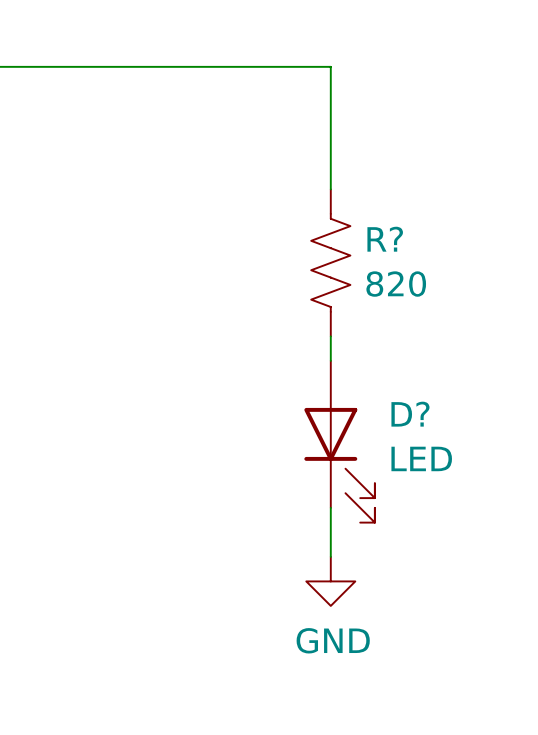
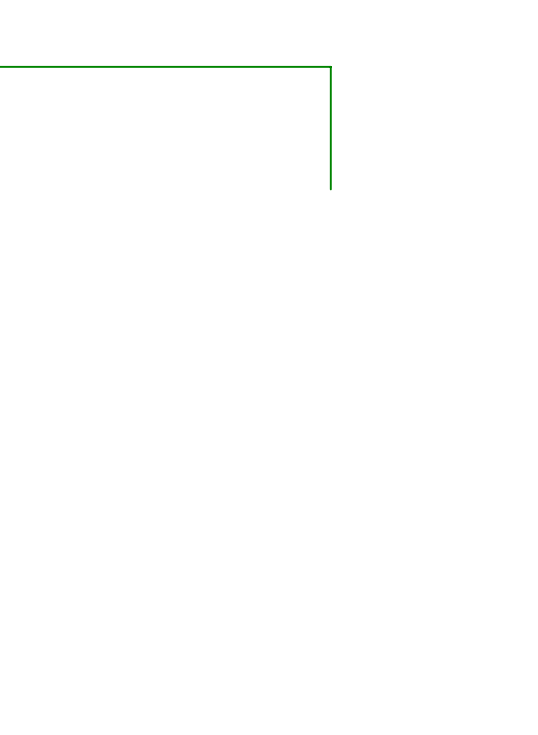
R?: 820 (330, 262) -> none
wire: (330, 336) (330, 360) -> none
D?: LED (339, 441) -> none
wire: (330, 507) (330, 556) -> none
power symbol: GND (330, 581) -> none

